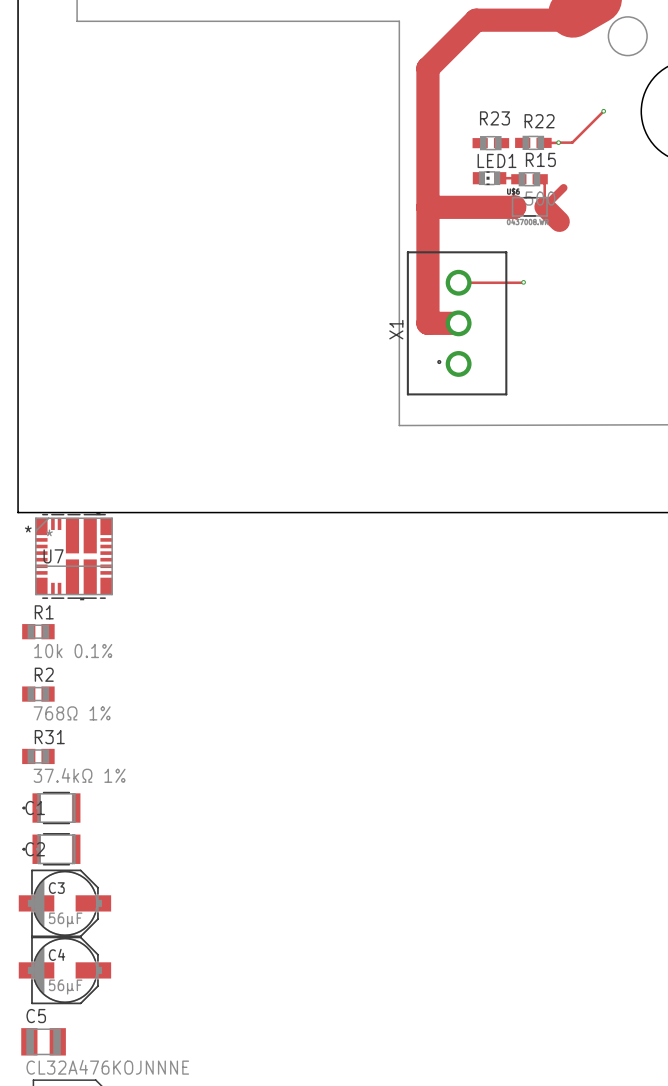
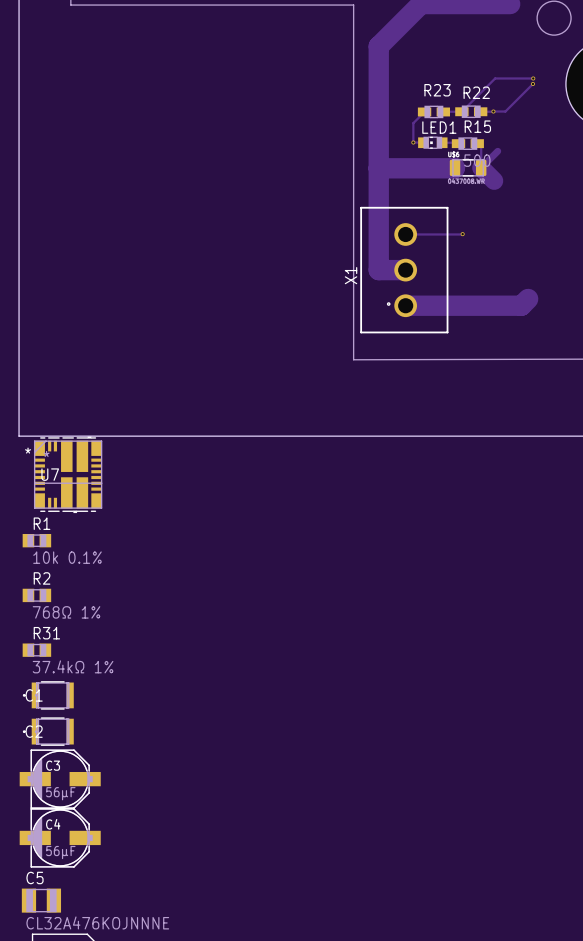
track: none -> (533, 78) (495, 78) (461, 111) (443, 111)
via: none -> (533, 78)
track: none -> (424, 111) (413, 123) (413, 142) (423, 142)
via: none -> (413, 142)
track: none -> (528, 298) (521, 305) (405, 305)

